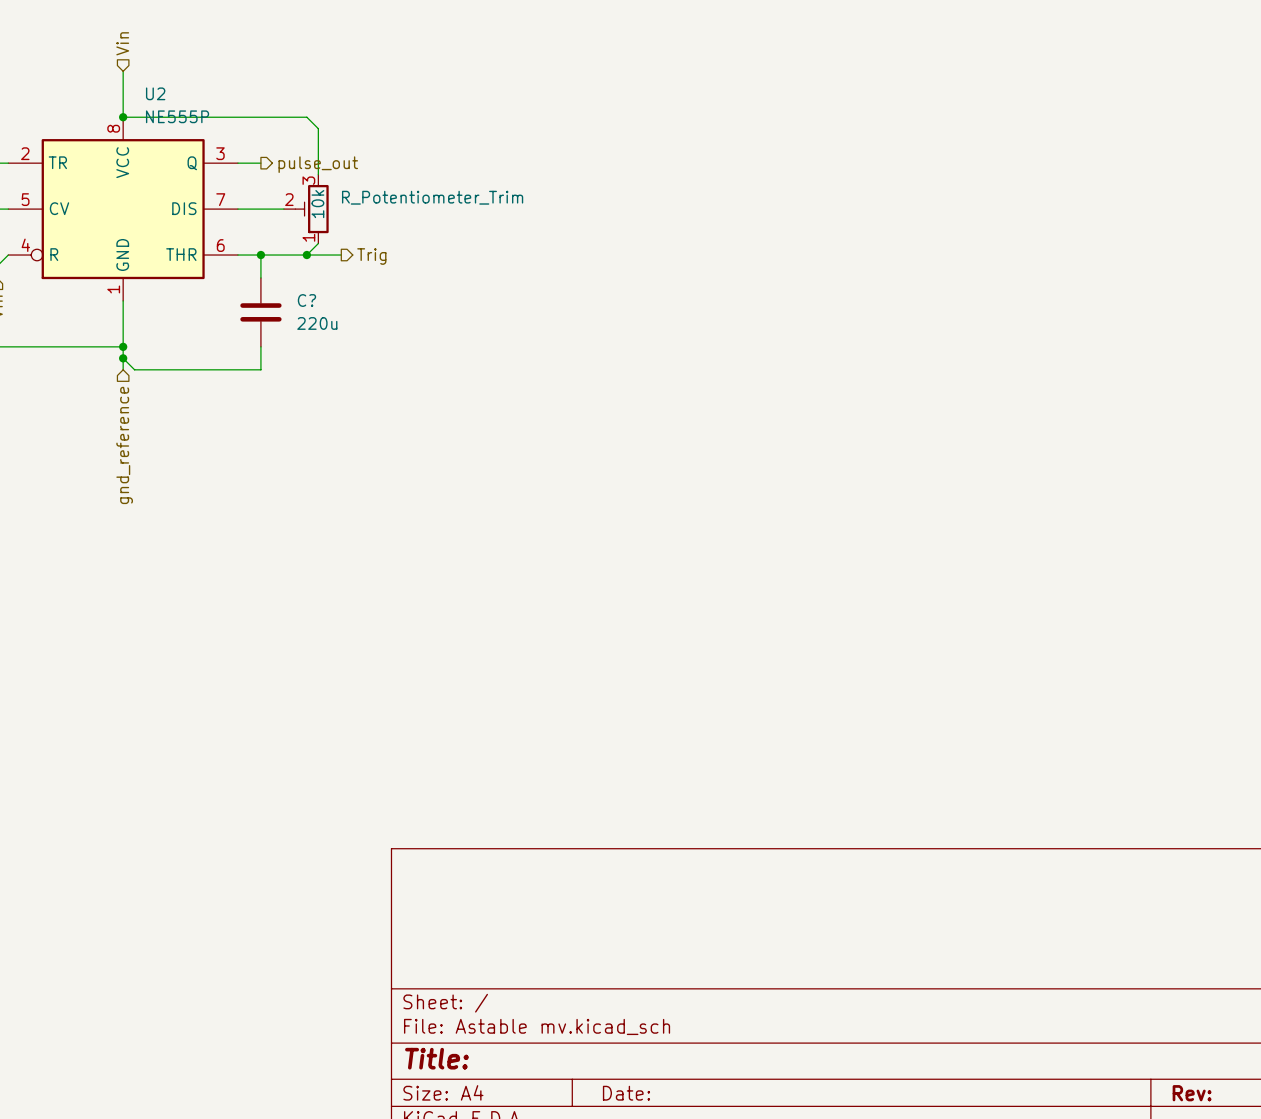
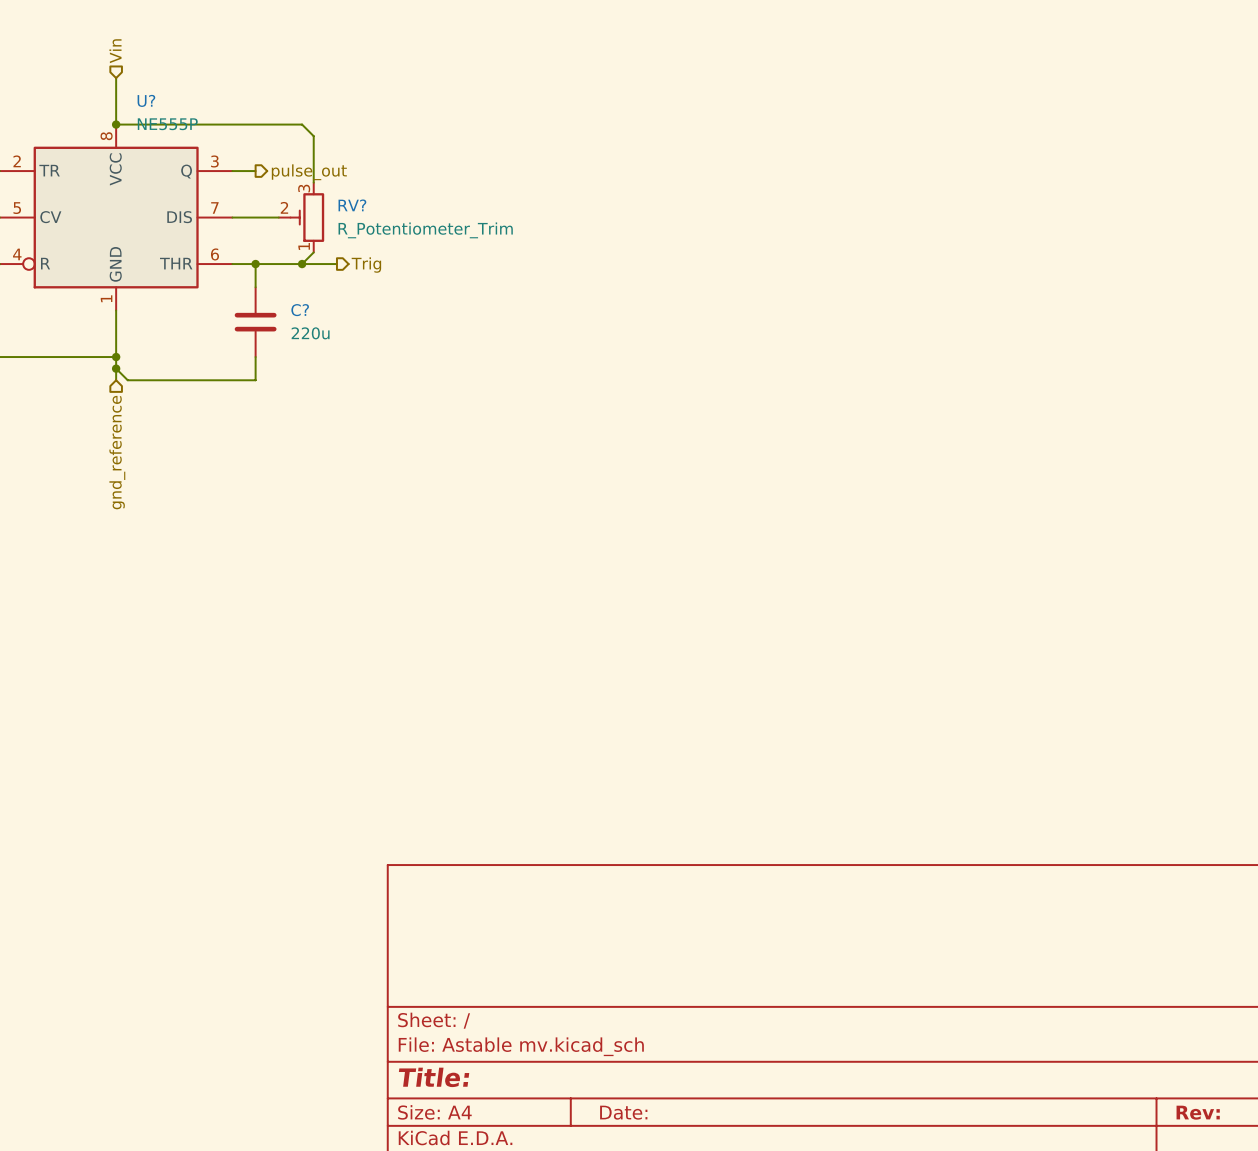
U2 name: U2 (155, 93) -> U? (146, 100)
R_Potentiometer_Trim name: R_Potentiometer_Trim (432, 197) -> RV? (352, 205)
R_Potentiometer_Trim value: 10k (317, 204) -> R_Potentiometer_Trim (425, 230)

